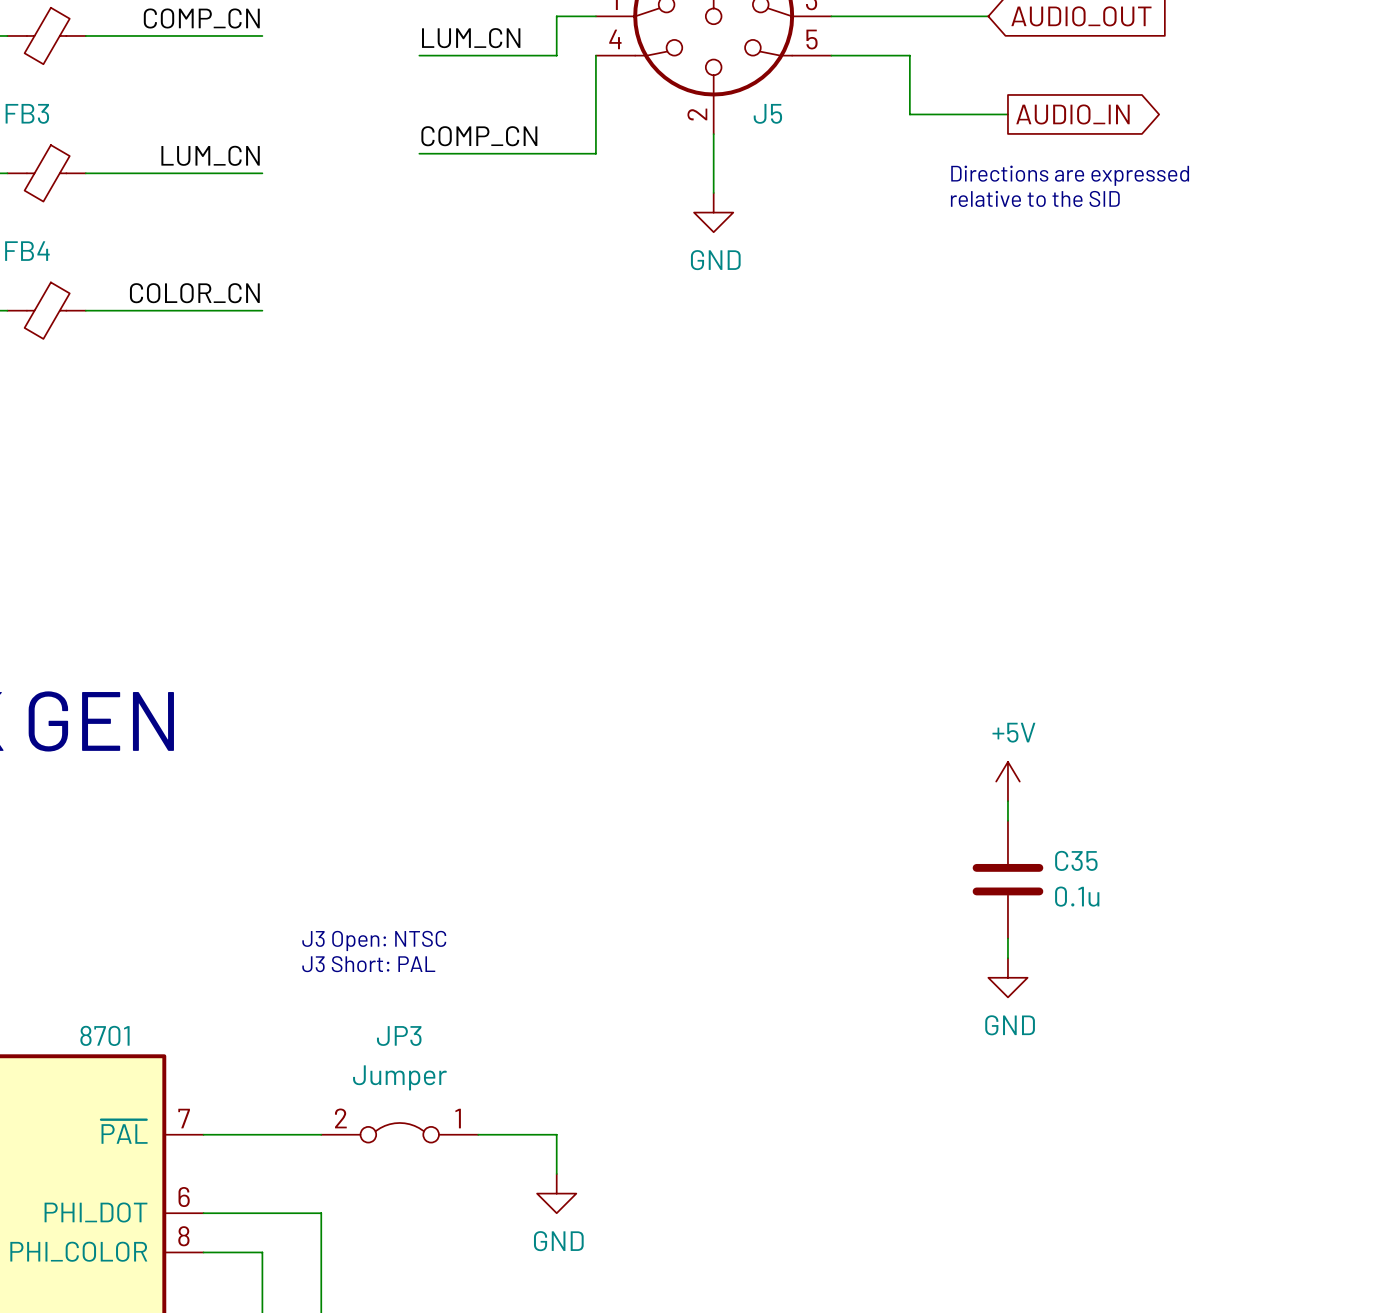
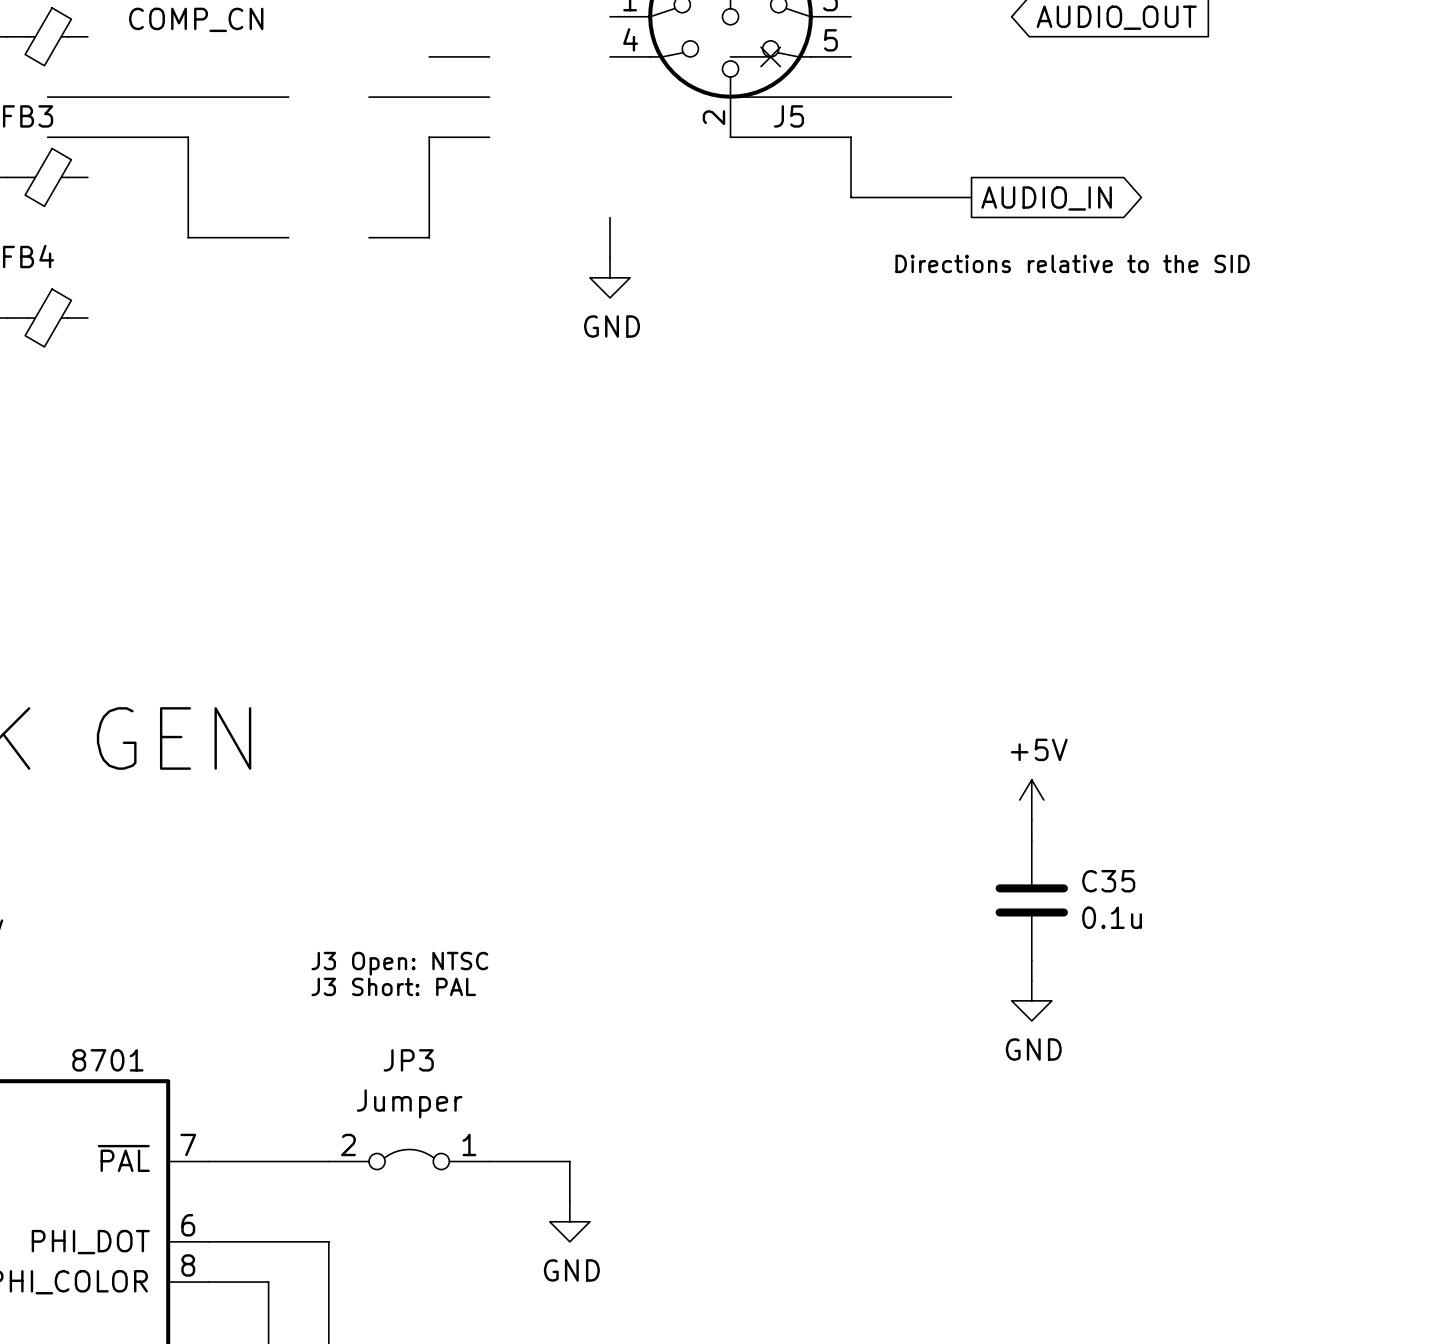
wire: (595, 16) (556, 16) (556, 55) (478, 55) -> none
wire: (831, 16) (988, 16) -> none
wire: (85, 35) (262, 35) -> none
label: LUM_CN (471, 38) -> none
wire: (595, 55) (595, 153) (419, 153) -> none
wire: none -> (730, 56) (770, 56)
no-connect mark: none -> (770, 56)
wire: (831, 55) (909, 55) (909, 114) (1007, 114) -> none
wire: none -> (47, 97) (288, 97)
wire: none -> (369, 97) (489, 97)
wire: none -> (730, 97) (951, 97)
global label position: AUDIO_IN (1072, 114) -> AUDIO_IN (1046, 198)
wire: none -> (47, 137) (188, 137) (188, 237) (288, 237)
wire: none -> (489, 137) (429, 137) (429, 237) (369, 237)
wire: (713, 134) (713, 192) -> (730, 137) (851, 137) (851, 197) (971, 197)
label: COMP_CN (479, 136) -> none
label: LUM_CN (210, 155) -> none
wire: (85, 173) (262, 173) -> none
text: Directions are expressed (1070, 175) -> none
text: relative to the SID (1035, 198) -> none
wire: none -> (610, 217) (610, 257)
power symbol position: GND (713, 212) -> GND (610, 277)
text: none -> Directions relative to the SID (1072, 263)
label: COLOR_CN (194, 293) -> none
wire: (85, 310) (262, 310) -> none

